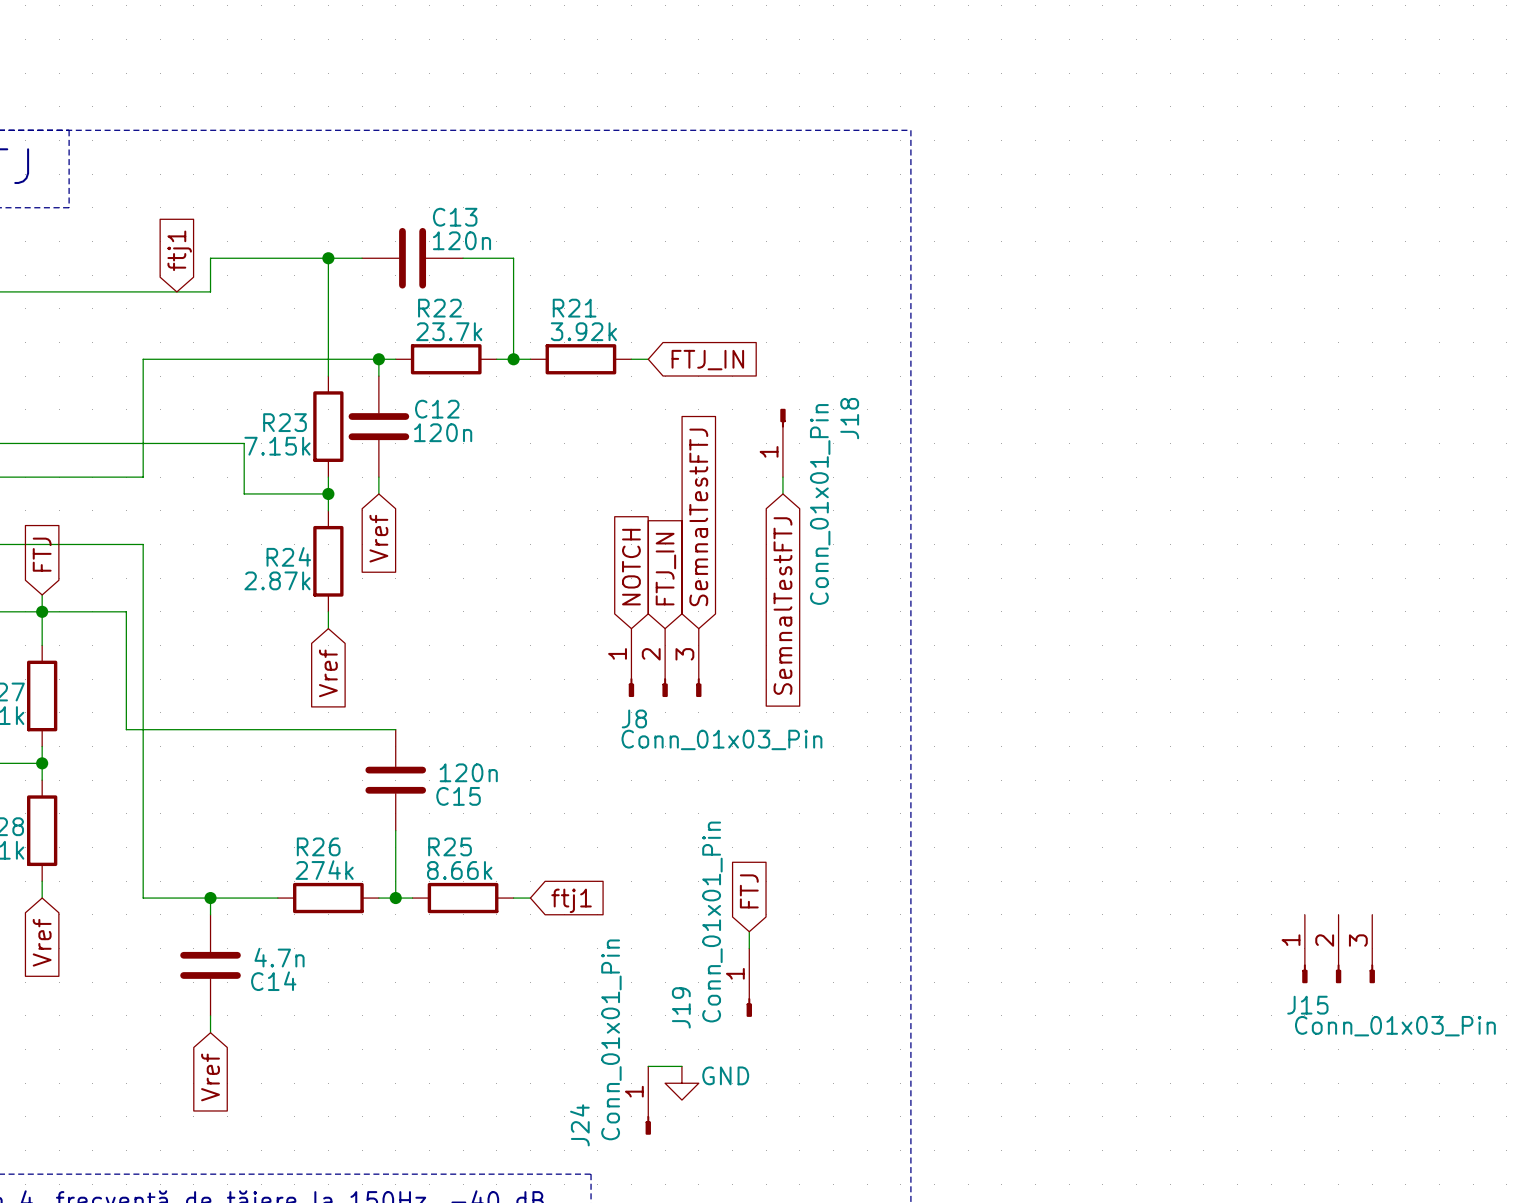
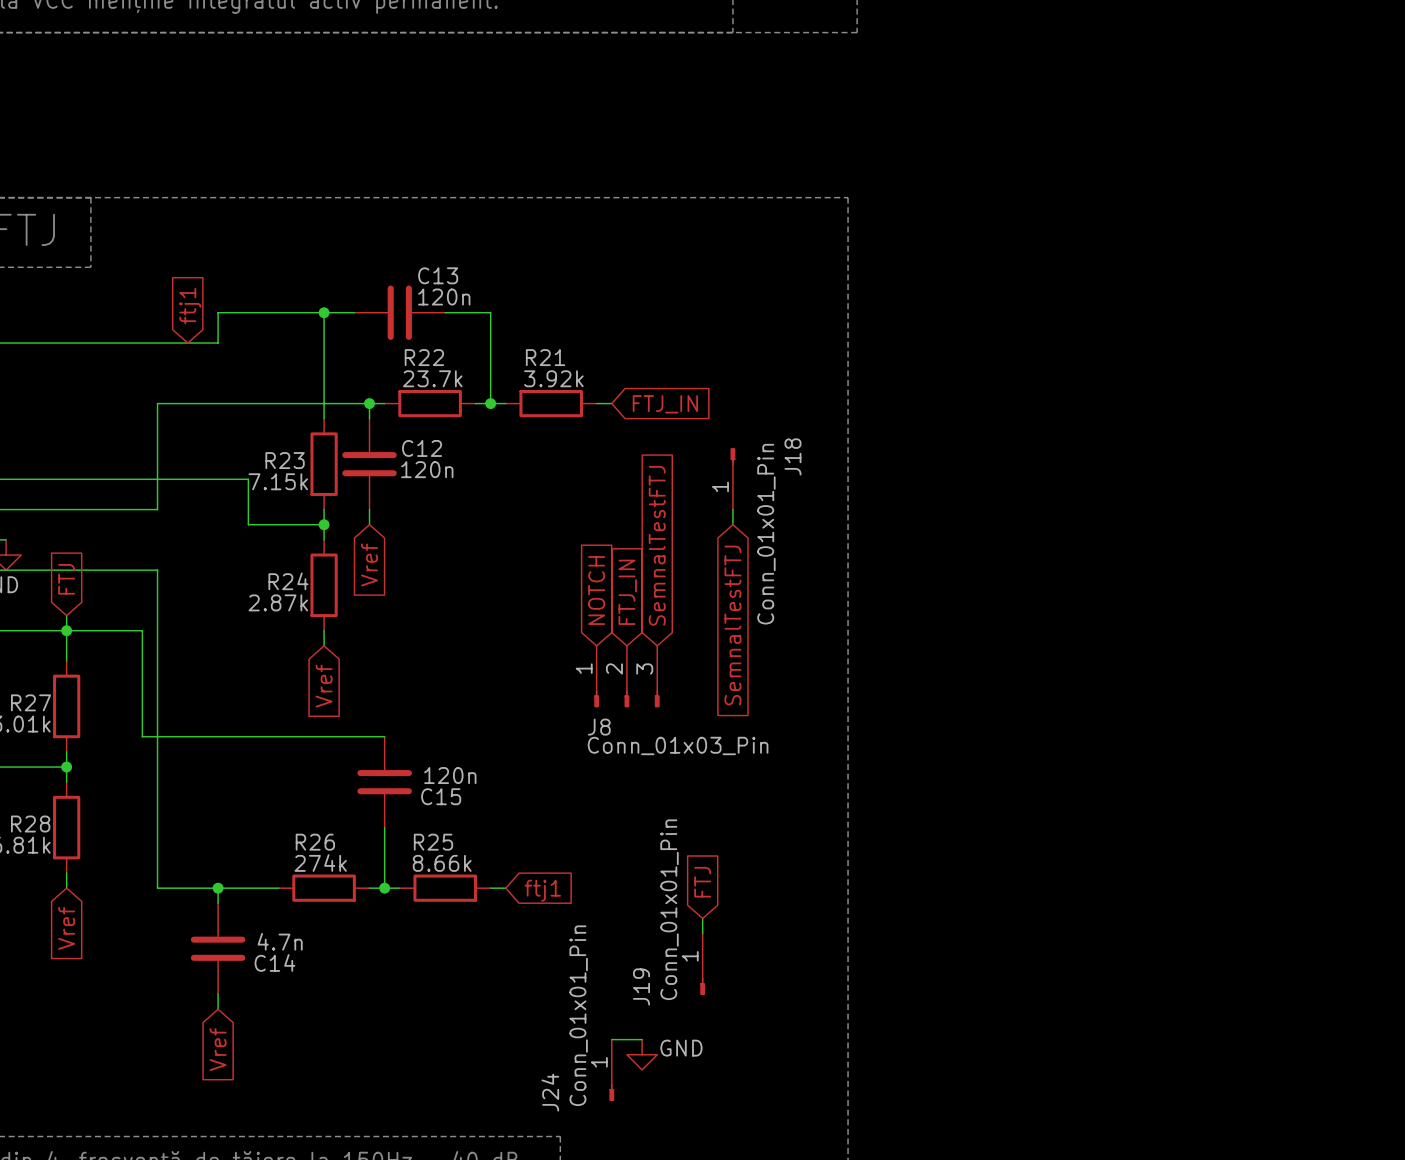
J15: Conn_01x03_Pin (1338, 949) -> none

